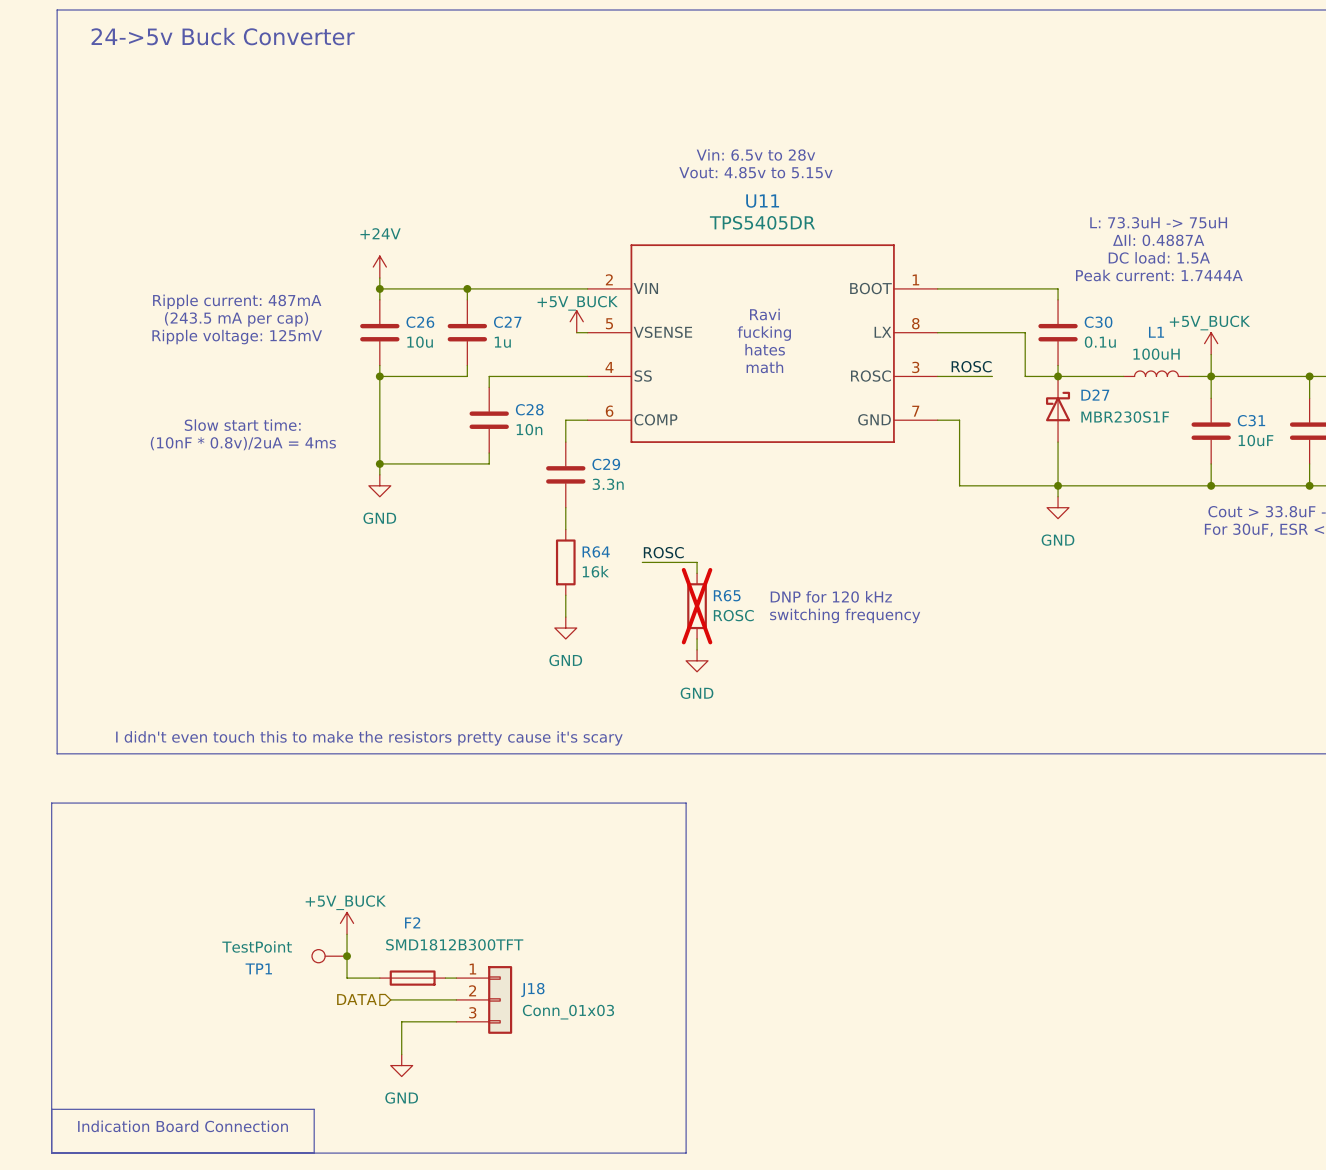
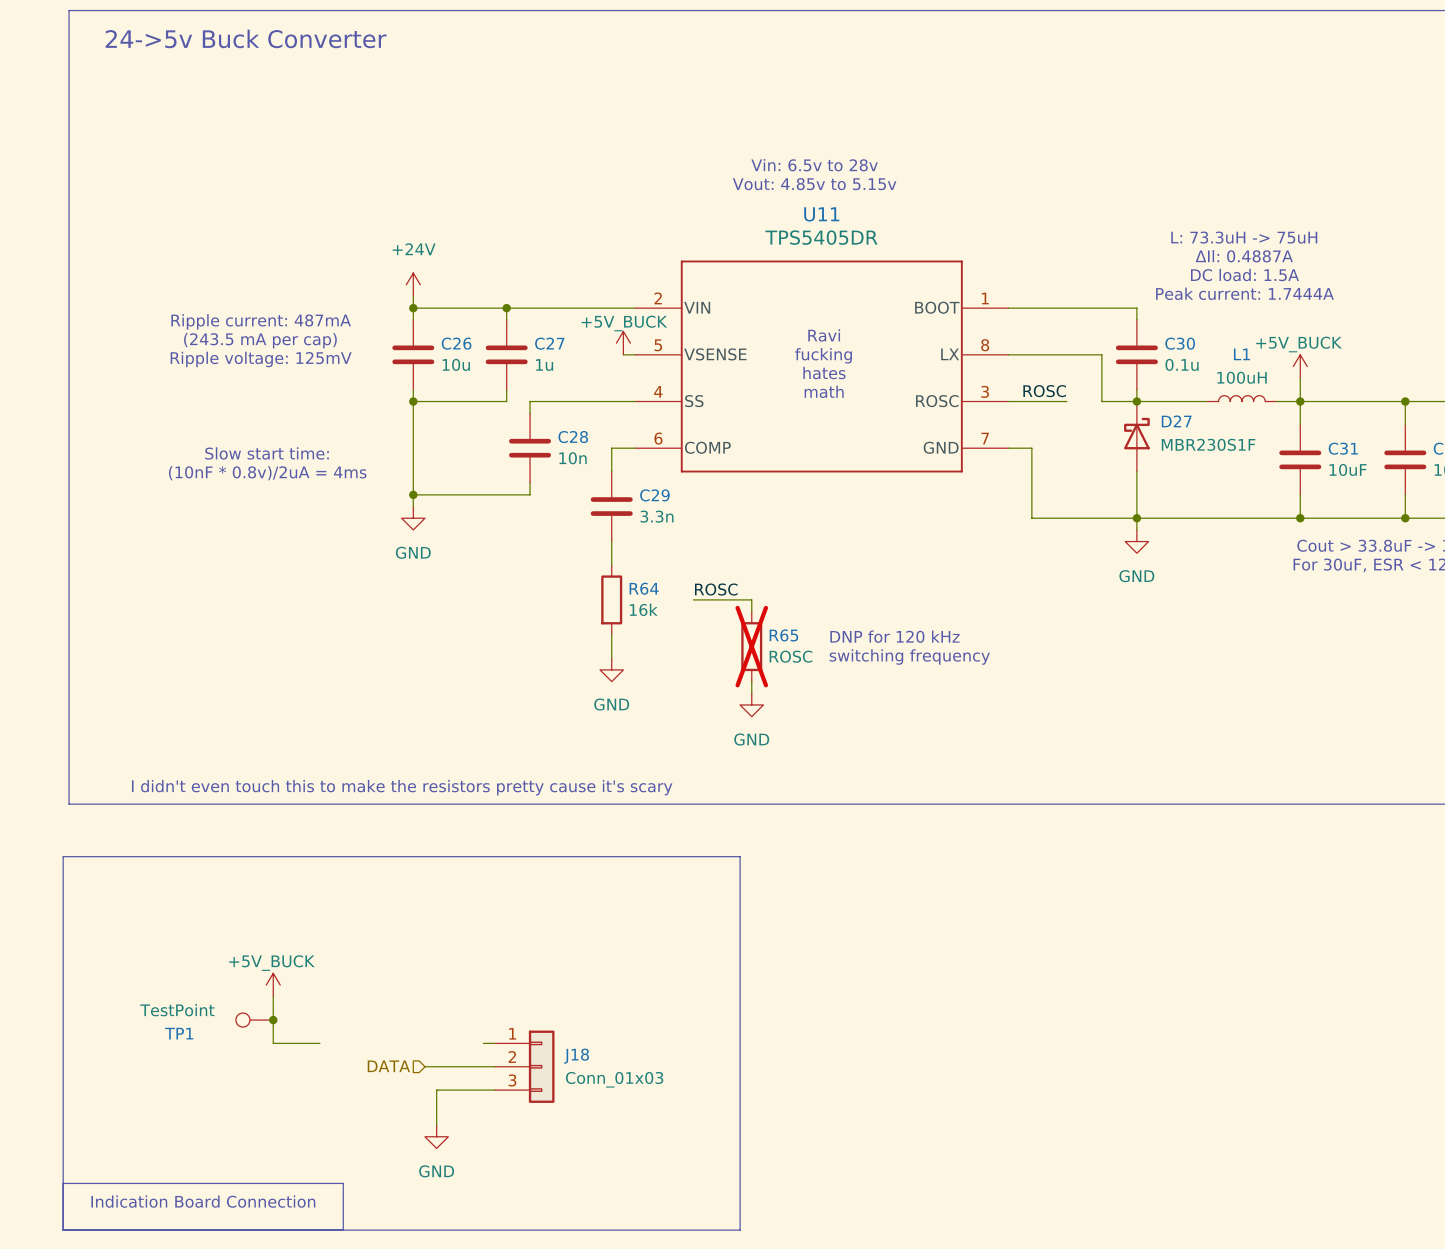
power symbol position: +5V_BUCK (347, 923) -> +5V_BUCK (273, 985)
wire: none -> (273, 996) (273, 1043) (319, 1043)
wire: (347, 934) (347, 978) (379, 978) -> none
junction: none -> (273, 1020)
TP1 position: (329, 956) -> (254, 1020)
junction: (347, 956) -> none
F2: SMD1812B300TFT (412, 978) -> none

